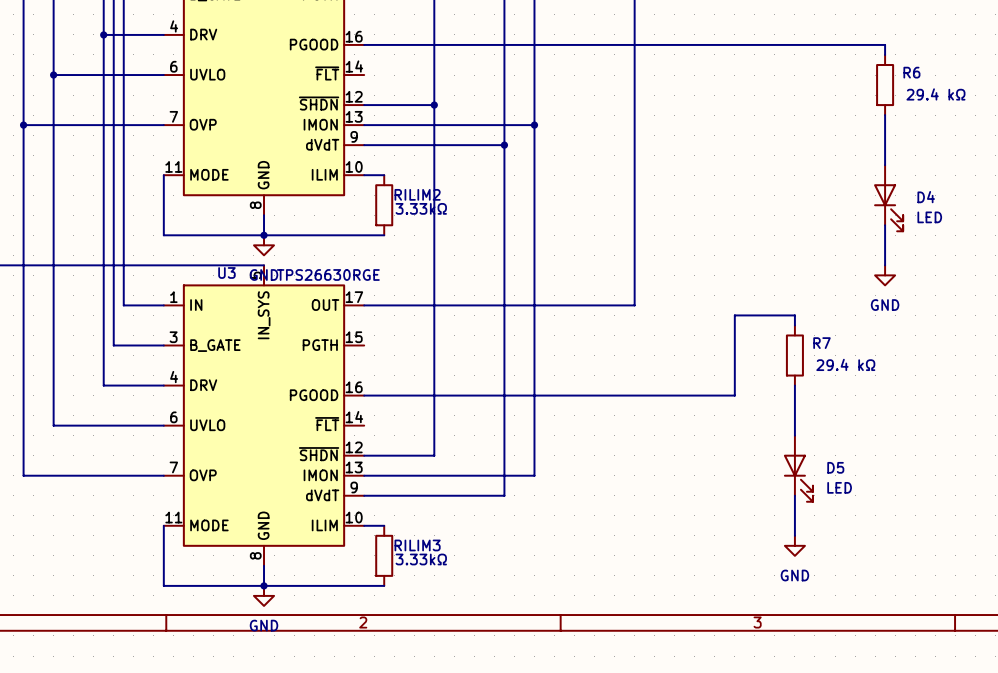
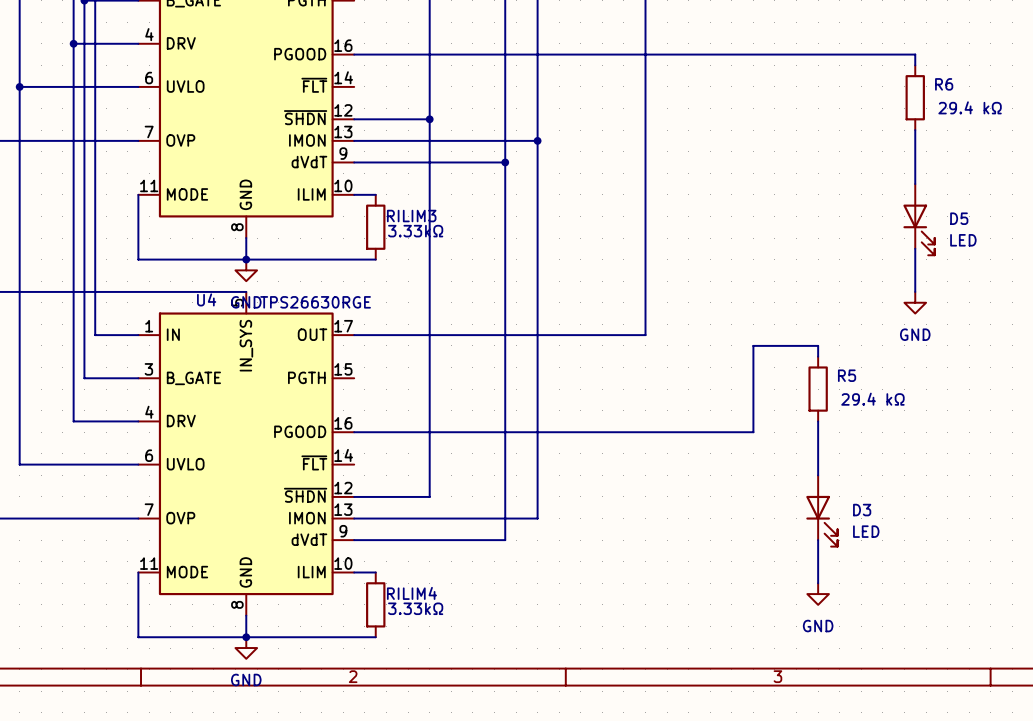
RILIM2 name: RILIM2 (417, 194) -> RILIM3 (411, 216)
D4 name: D4 (926, 197) -> D5 (959, 218)
U3 name: U3 (226, 272) -> U4 (206, 299)
R7 name: R7 (822, 343) -> R5 (847, 375)
D5 name: D5 (835, 467) -> D3 (862, 510)
RILIM3 name: RILIM3 (417, 545) -> RILIM4 (411, 593)

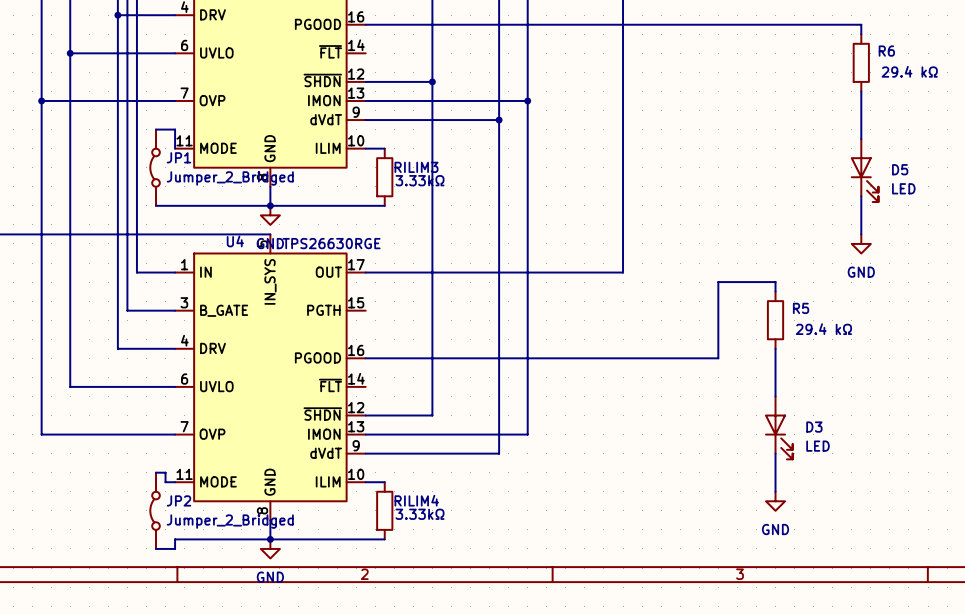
wire: none -> (156, 129) (175, 129) (175, 148)
wire: (138, 194) (138, 259) -> (156, 205) (175, 205)
JP1: none -> Jumper_2_Bridged (155, 167)
wire: (138, 572) (138, 637) -> (175, 482) (165, 482) (165, 472) (156, 472)
JP2: none -> Jumper_2_Bridged (155, 510)
wire: none -> (175, 539) (175, 548) (156, 548)

